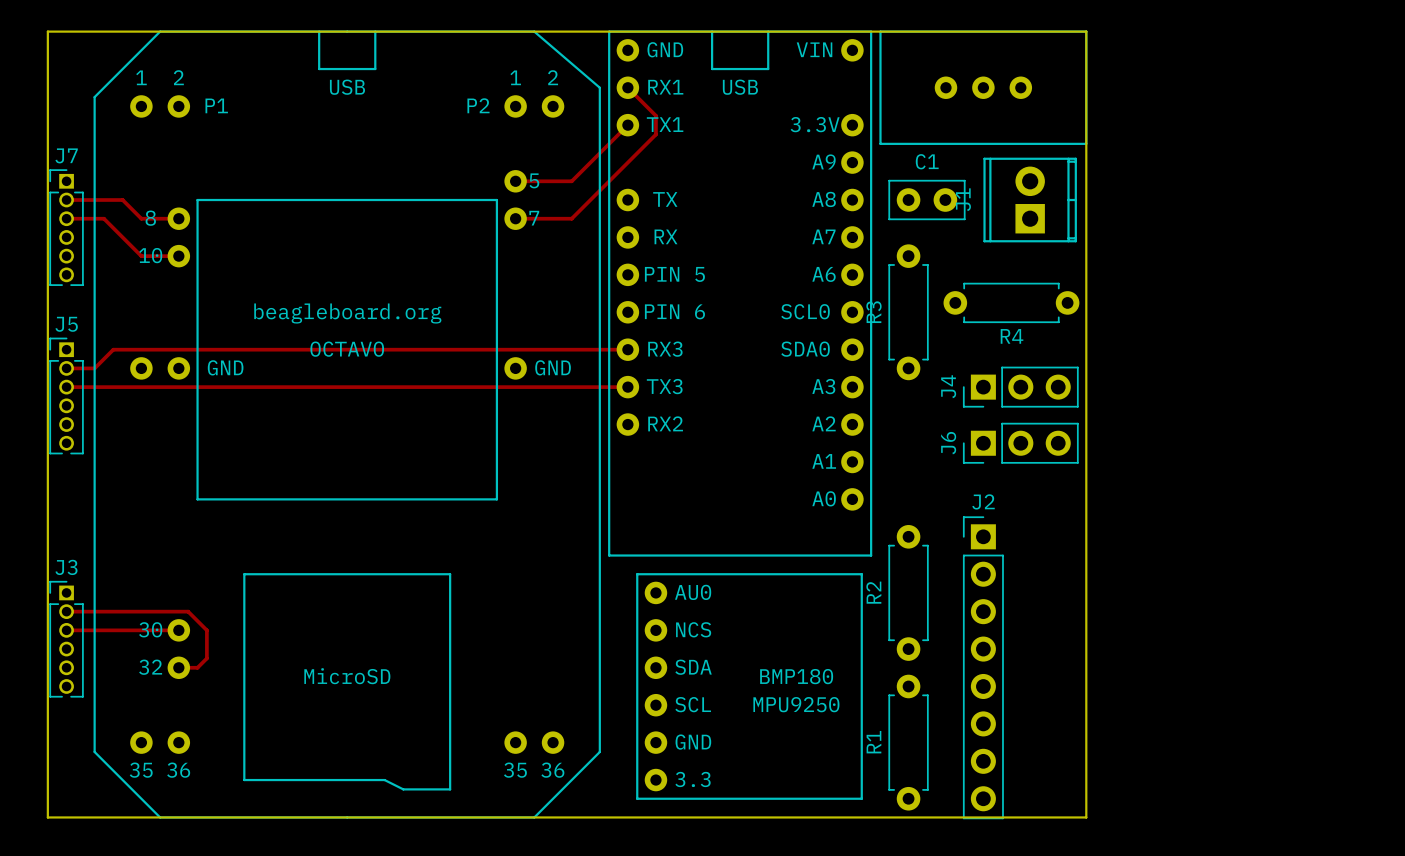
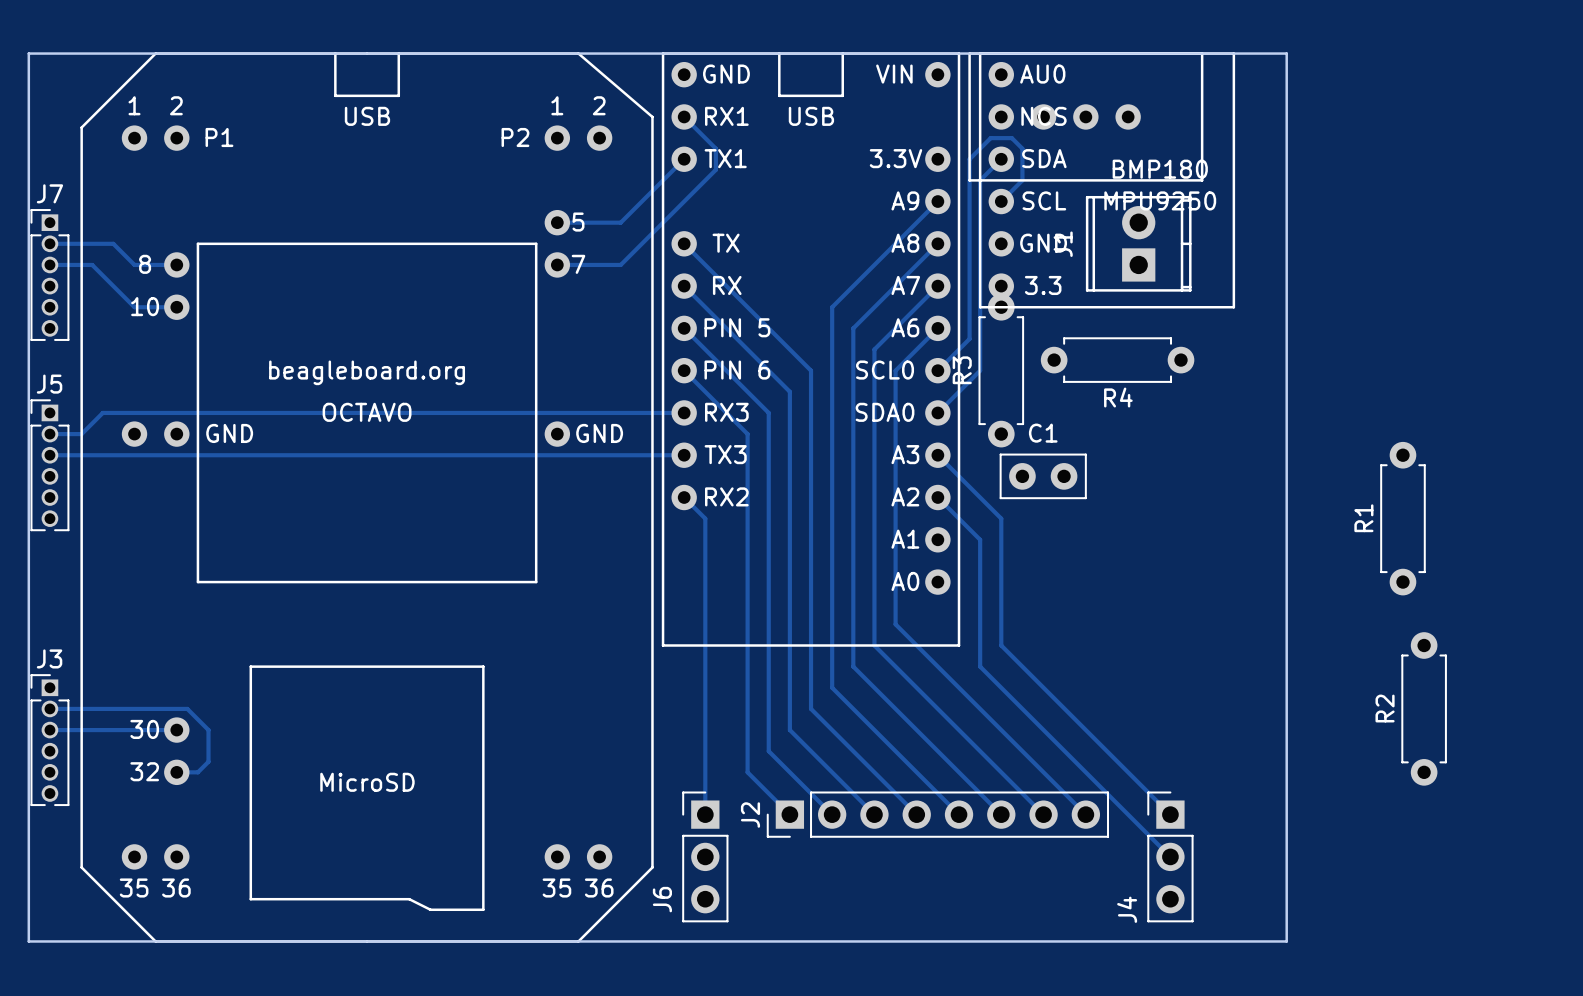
board edge: (1086, 31) (1086, 817) -> (1202, 53) (1286, 53) (1286, 941) (1202, 941)
track: none -> (1001, 159) (980, 180) (980, 370) (937, 412)
part: none -> (1107, 180)
track: none -> (937, 201) (832, 307) (832, 687) (959, 814)
track: none -> (1001, 201) (1022, 180) (1022, 148) (1011, 138) (990, 138) (969, 159) (969, 338) (937, 370)
track: none -> (684, 243) (811, 370) (811, 708) (916, 814)
track: none -> (937, 243) (853, 328) (853, 666) (1001, 814)
C1 position: (926, 200) -> (1043, 476)
track: none -> (684, 286) (789, 391) (789, 730) (874, 814)
track: none -> (937, 286) (874, 349) (874, 645) (1043, 814)
track: none -> (684, 328) (768, 412) (768, 751) (832, 814)
track: none -> (937, 328) (895, 370) (895, 624) (1085, 814)
track: none -> (684, 370) (747, 434) (747, 772) (789, 814)
J4 name position: J4 (948, 386) -> J4 (1127, 909)
track: none -> (937, 455) (1001, 518) (1001, 645) (1170, 814)
J4 rotation: 0° (1020, 387) -> 90° clockwise (1170, 856)
J4 position: (1020, 387) -> (1170, 856)
track: none -> (684, 497) (705, 518) (705, 814)
track: none -> (937, 497) (980, 539) (980, 666) (1170, 856)
J6 name position: J6 (948, 443) -> J6 (662, 899)
J6 rotation: 0° (1020, 443) -> 90° clockwise (705, 856)
J6 position: (1020, 443) -> (705, 856)
R2 position: (908, 592) -> (1424, 708)
J2 rotation: 0° (983, 667) -> 90° counterclockwise (937, 814)
part: (749, 686) -> none
R1 position: (908, 742) -> (1402, 518)

